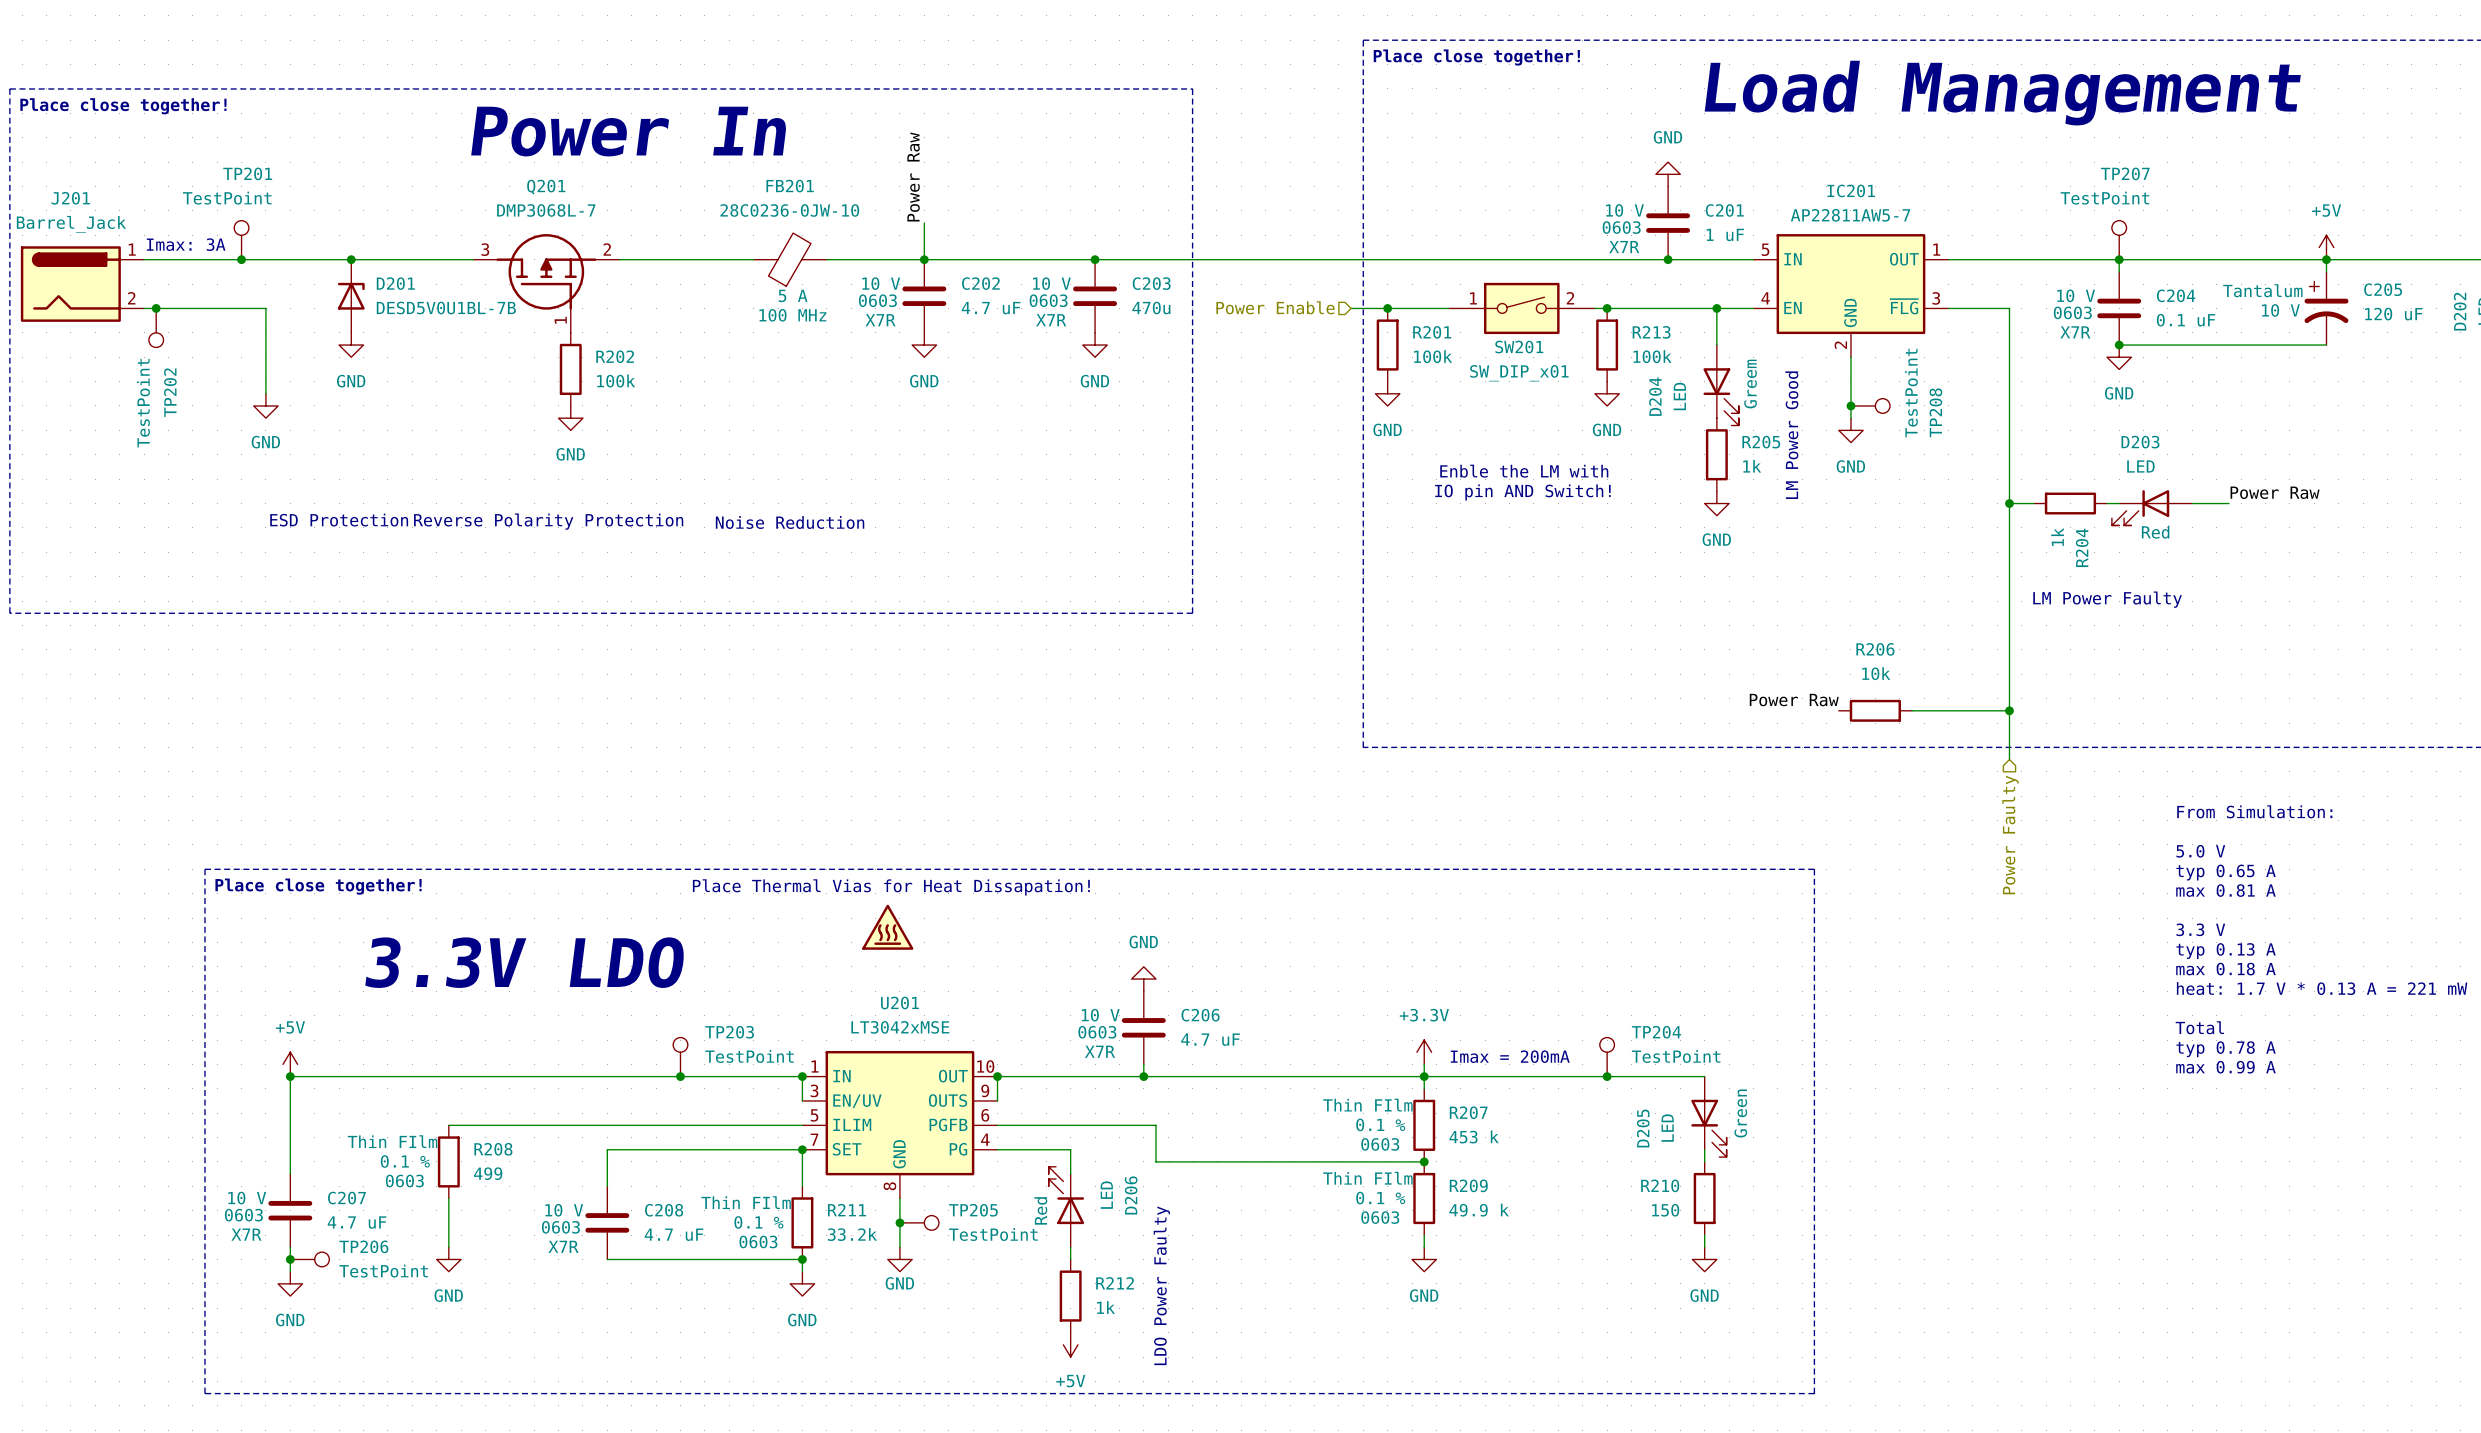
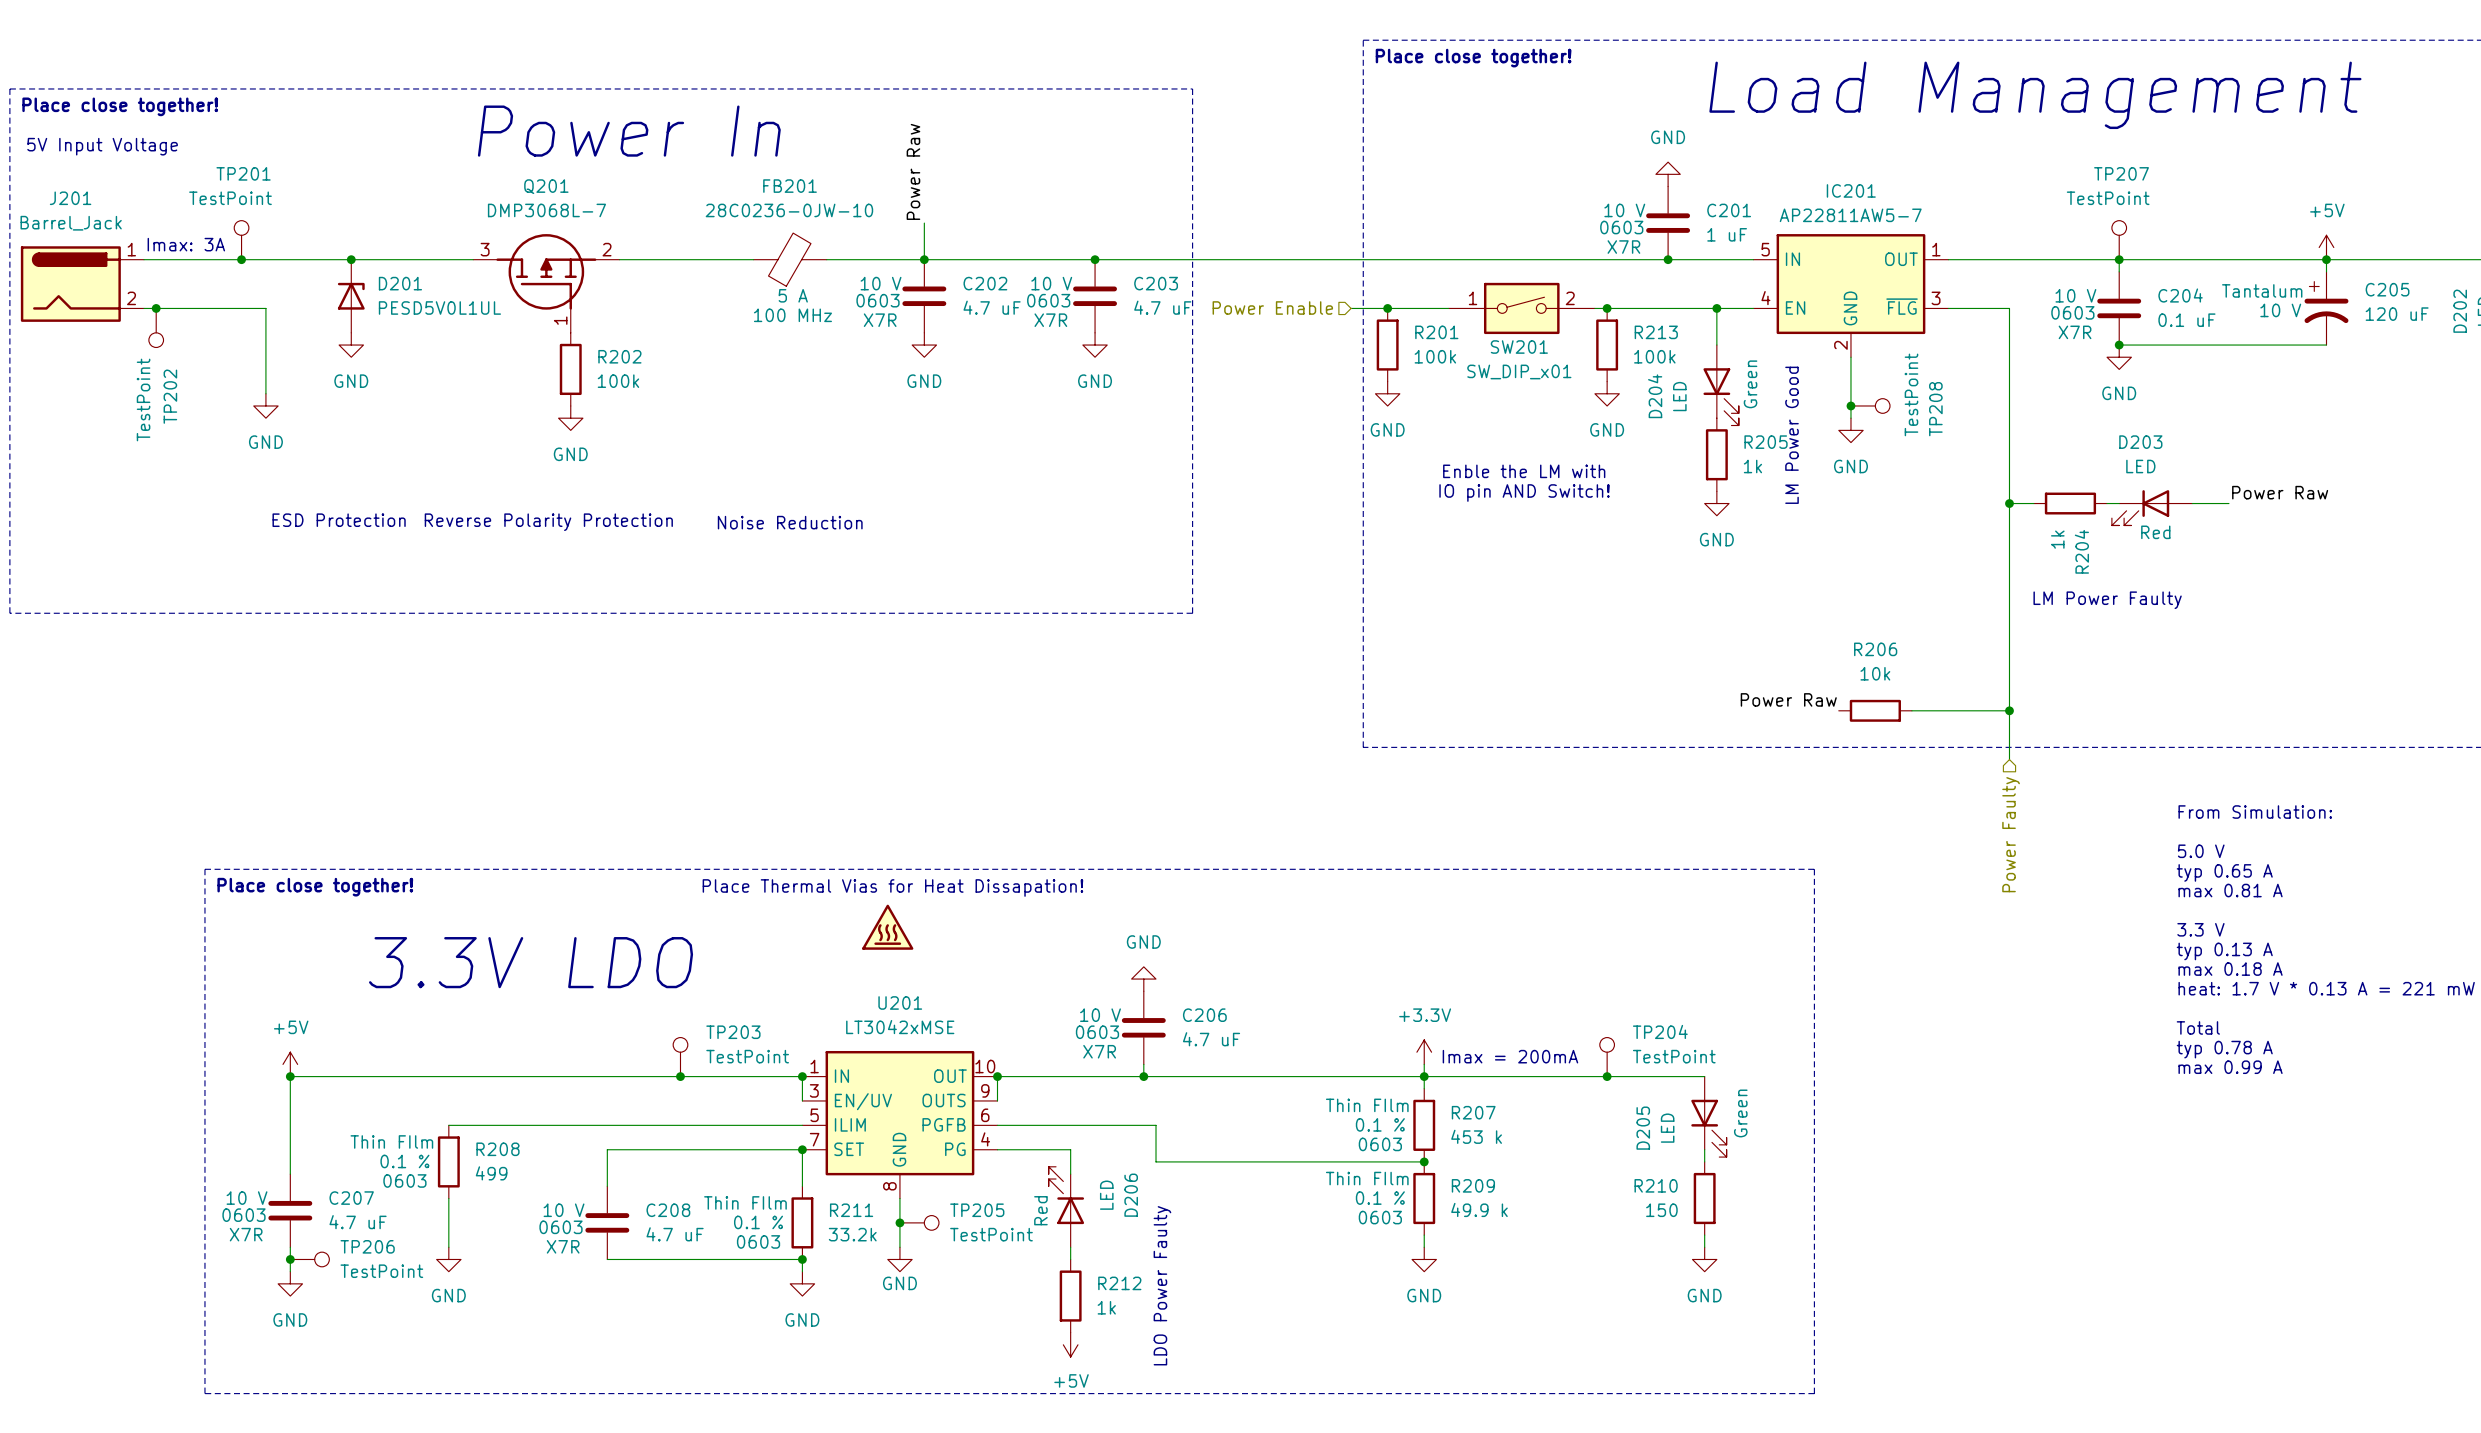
text: none -> 5V Input Voltage (102, 146)
D201 value: DESD5V0U1BL-7B (446, 308) -> PESD5V0L1UL (439, 307)
C203 value: 470u (1151, 308) -> 4.7 uF (1162, 307)
D204 text: Greem (1750, 384) -> Green (1750, 384)

